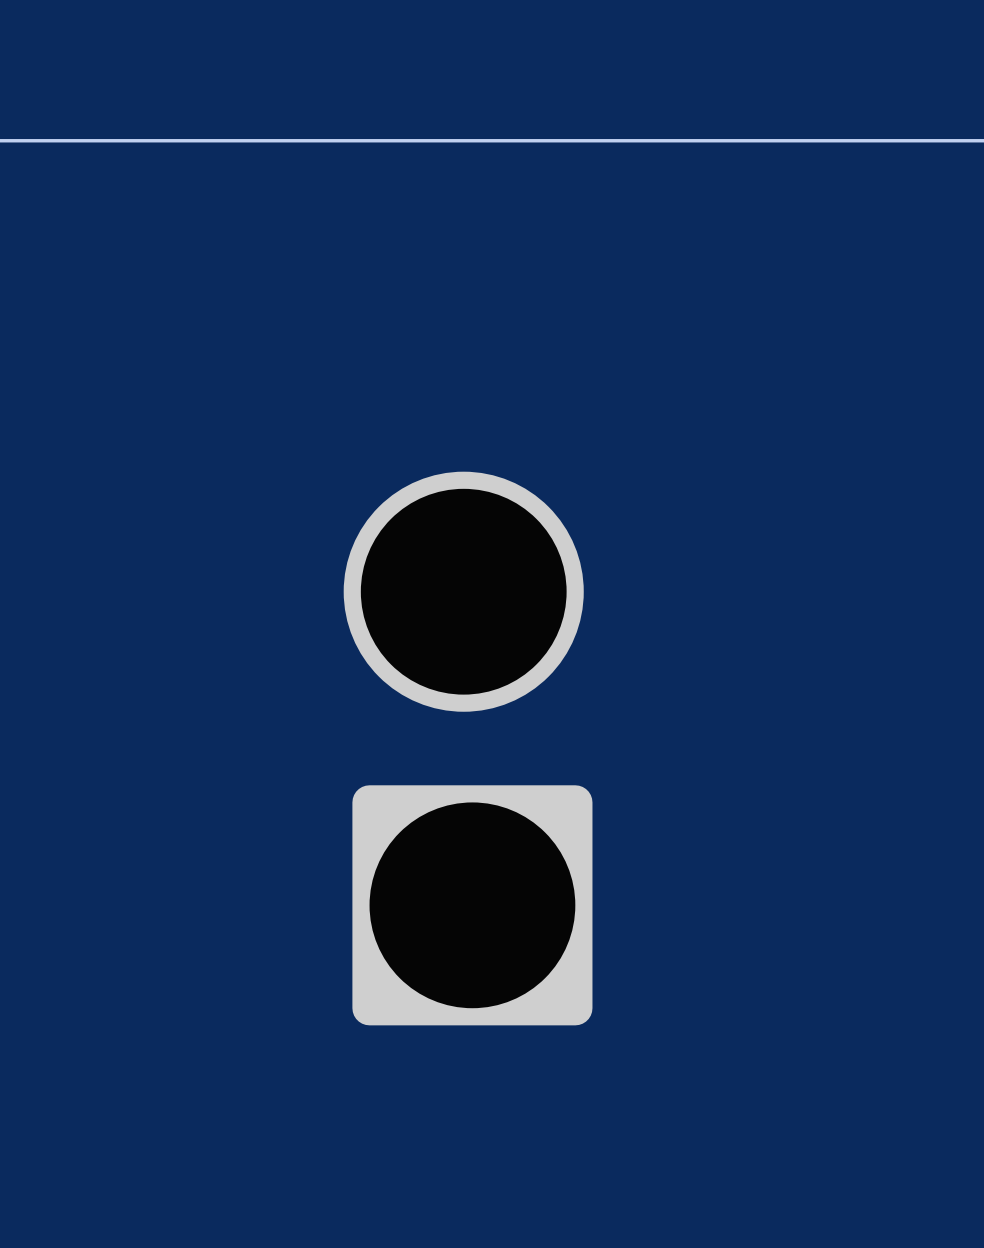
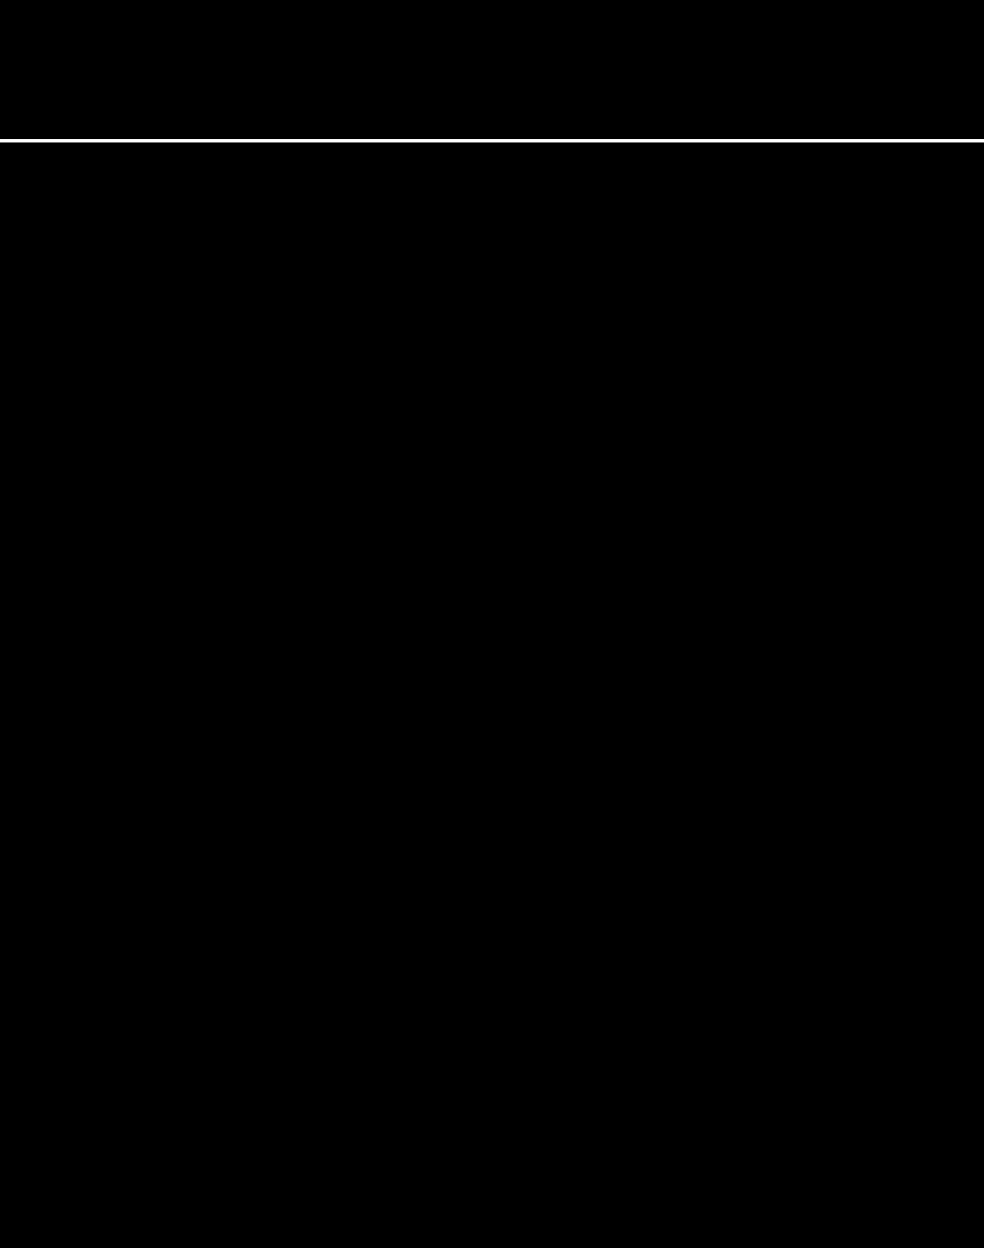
part: (468, 748) -> none

